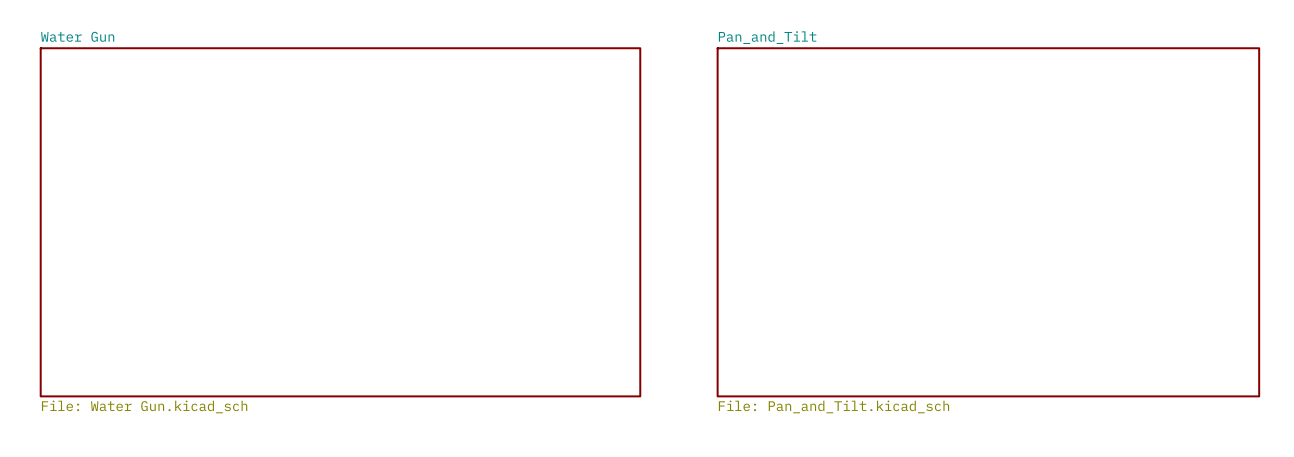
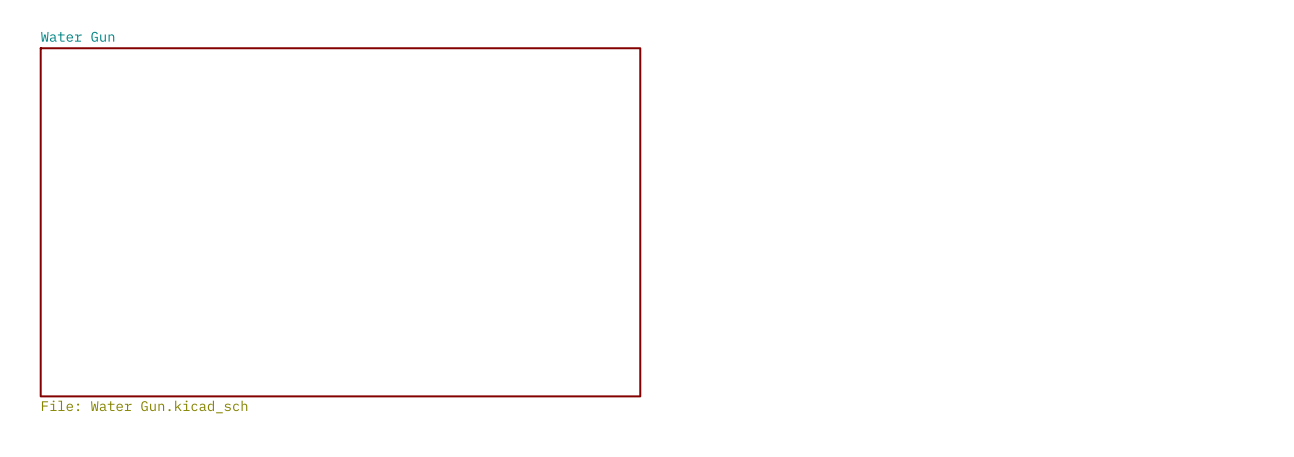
sheet Pan_and_Tilt: File: Pan_and_Tilt.kicad_sch (988, 222) -> none

